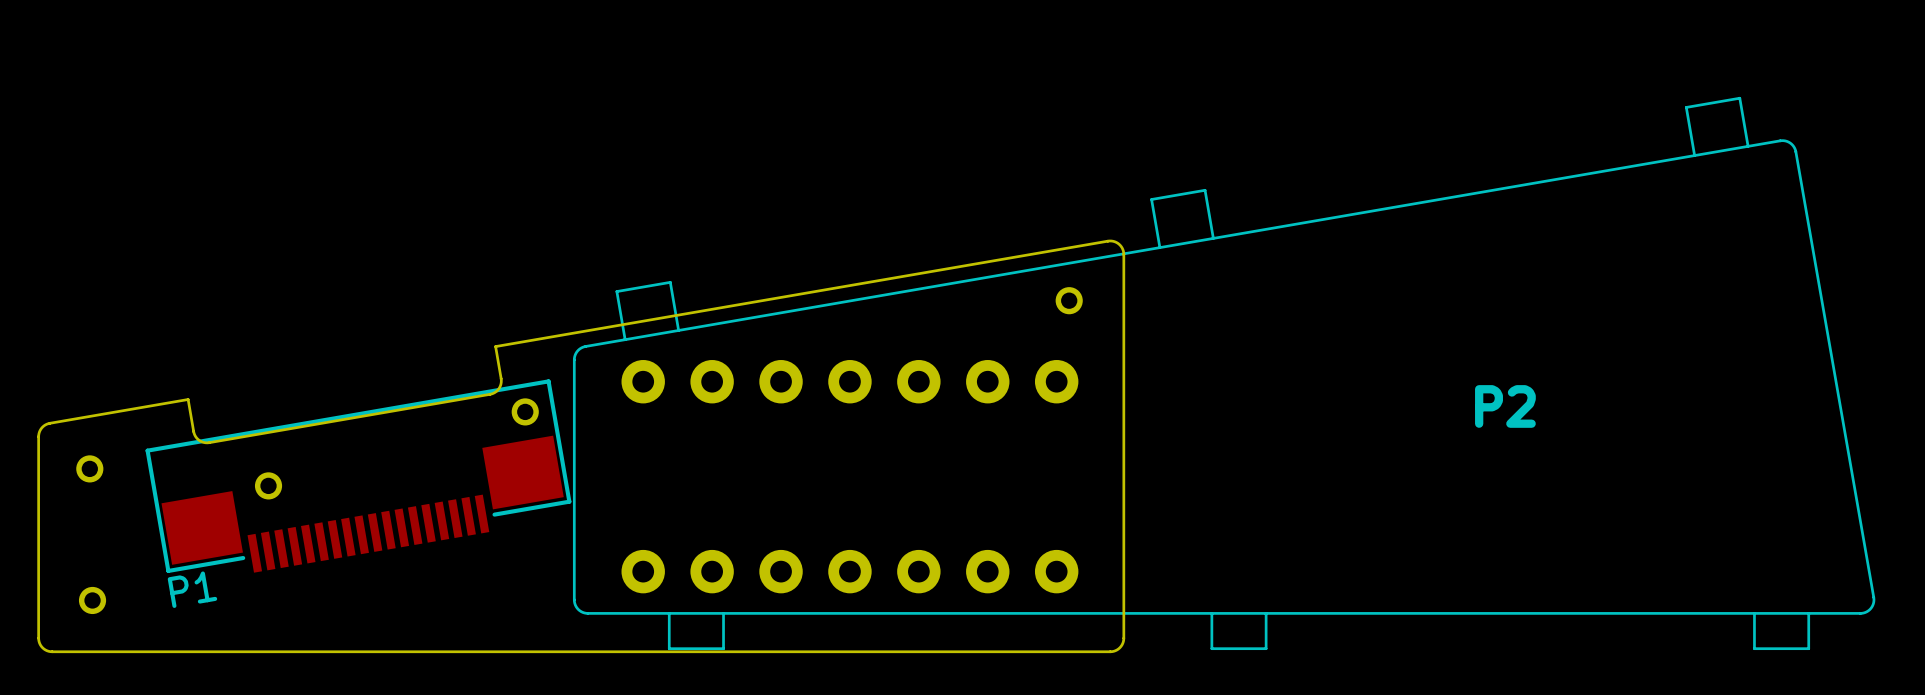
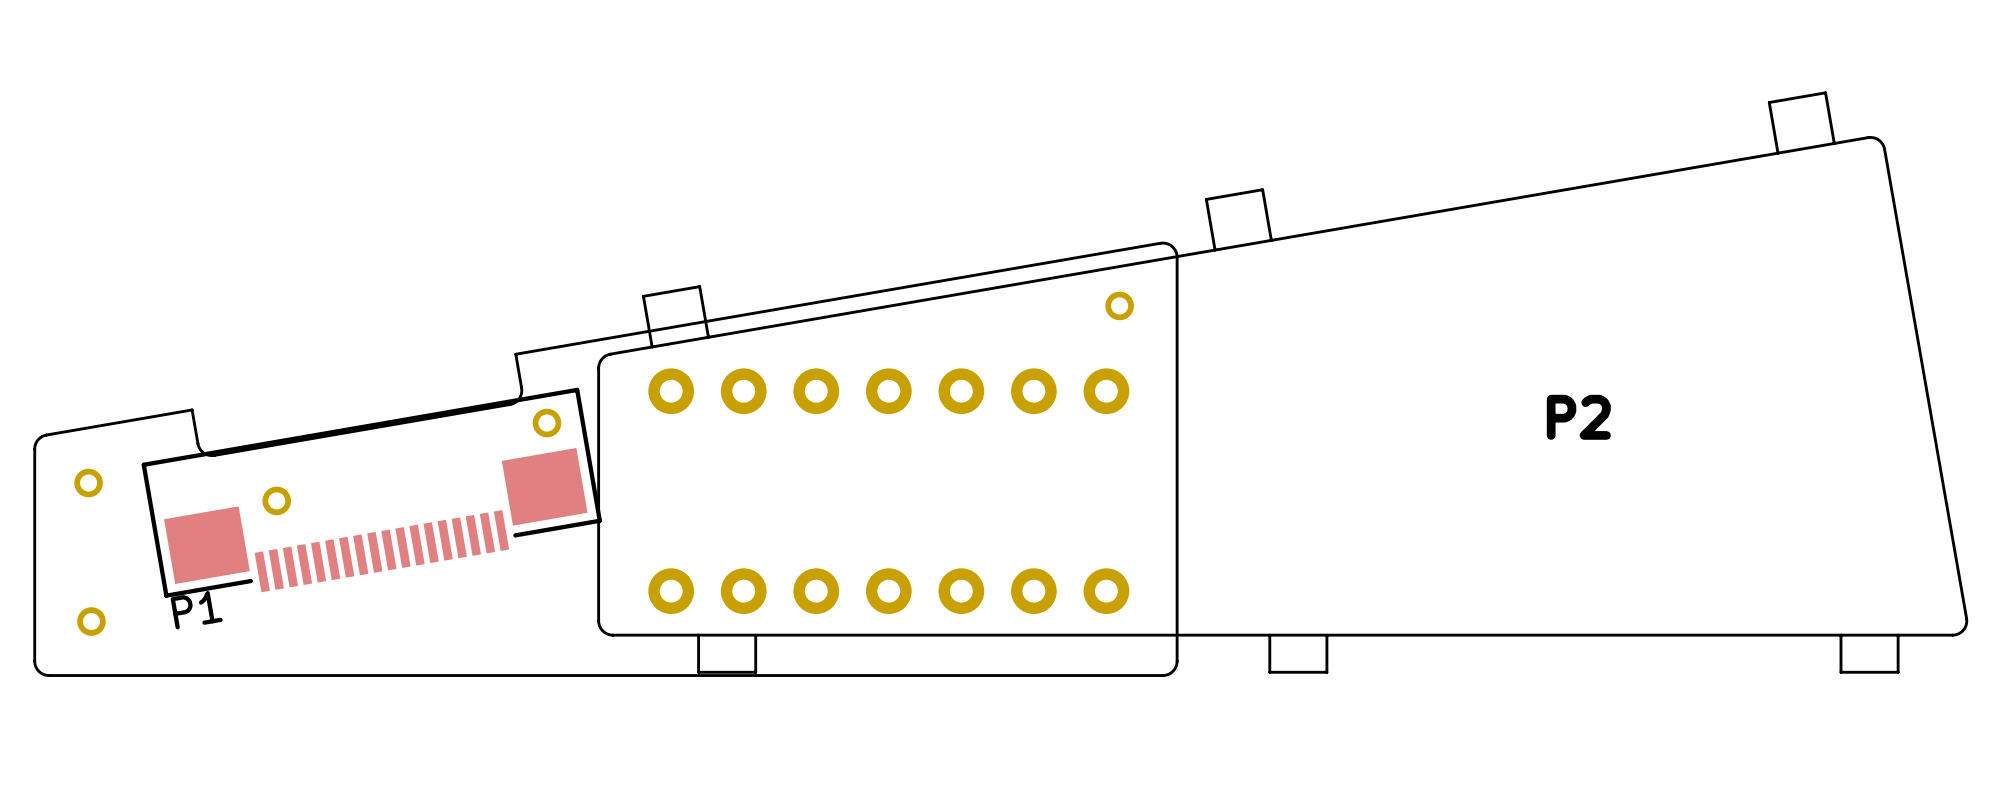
P1 footprint: [145, 379, 572, 573] -> [141, 387, 602, 598]

